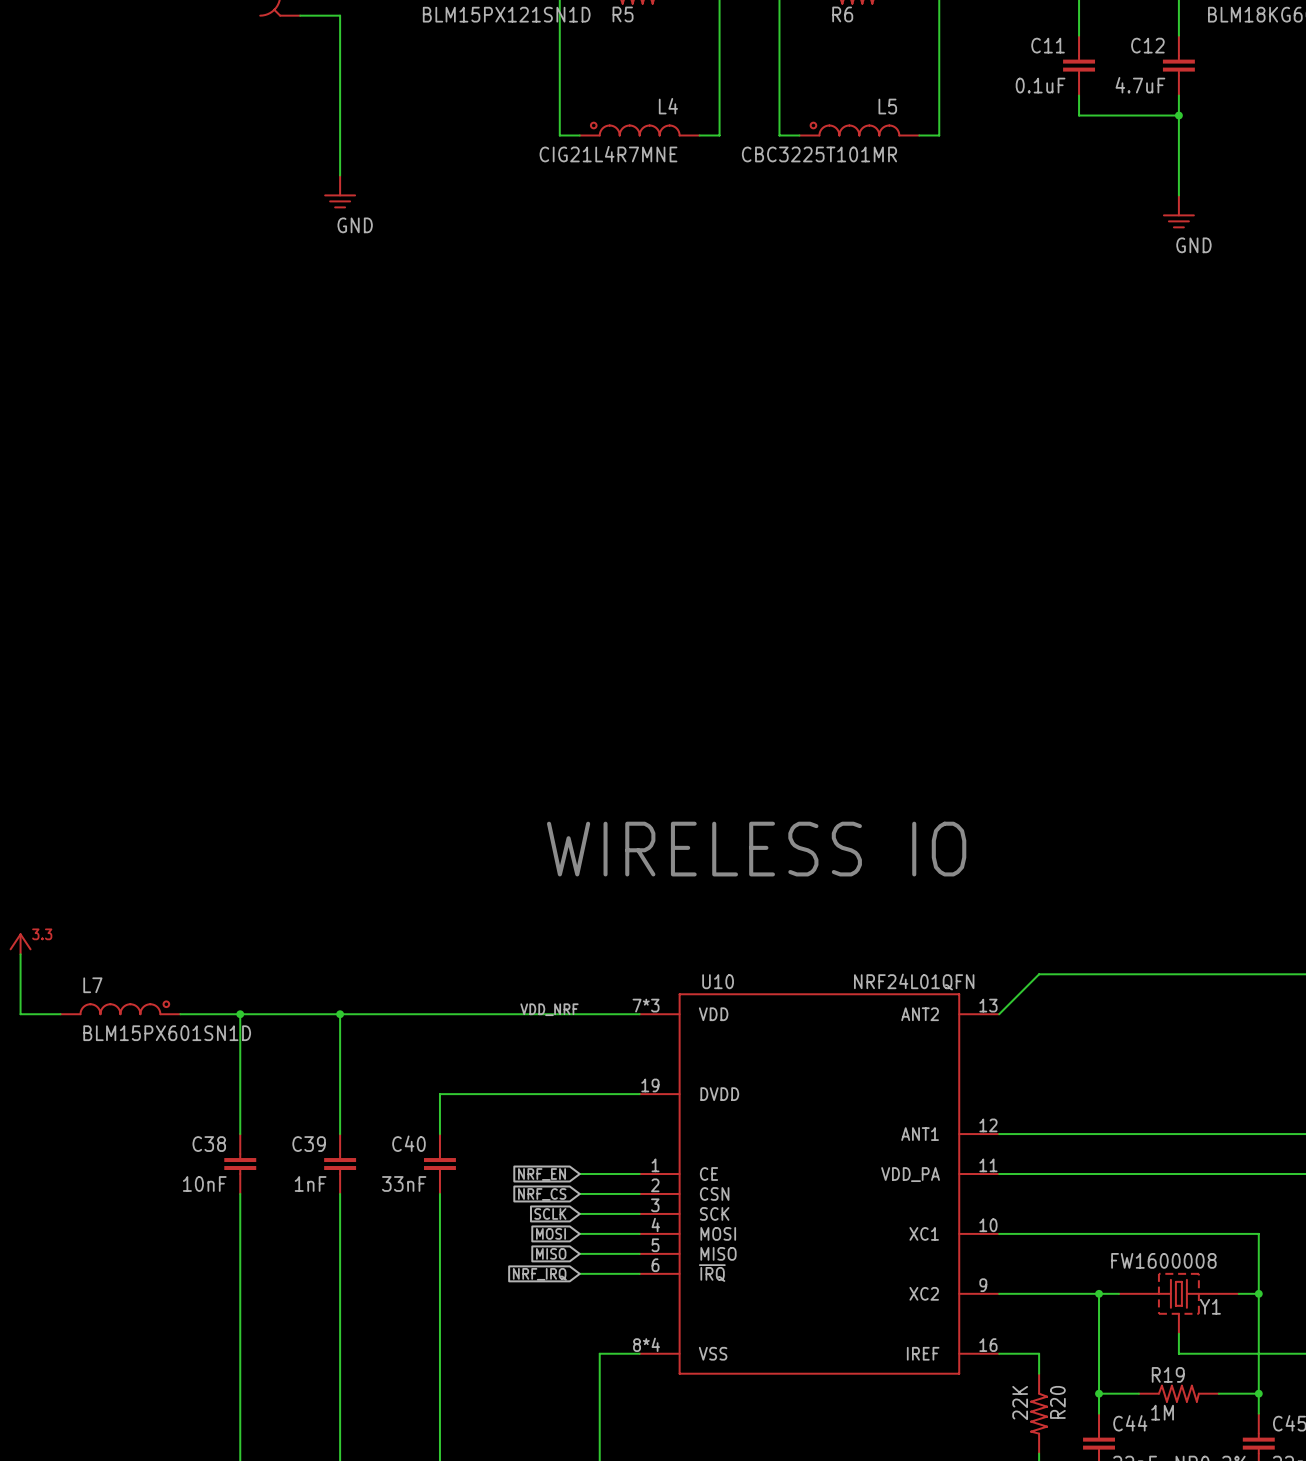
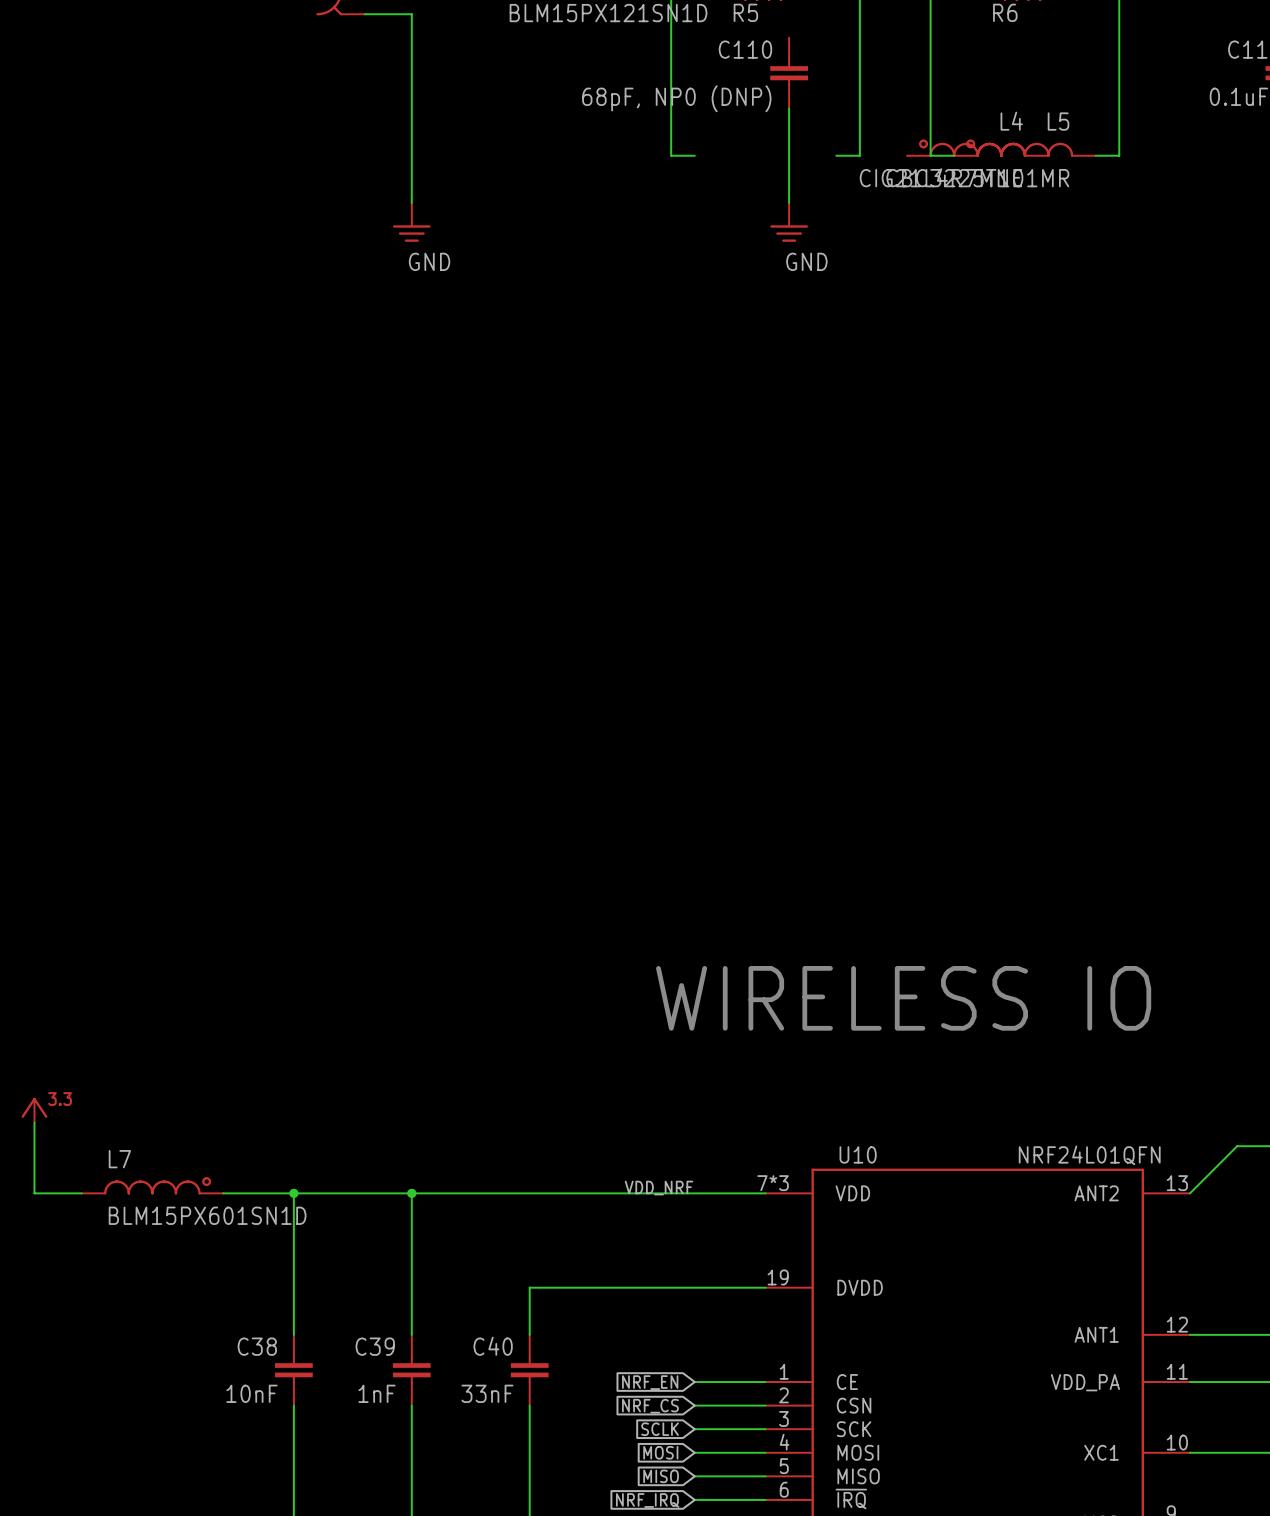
C110: none -> 68pF, NP0 (DNP) (789, 73)
wire: none -> (789, 108) (789, 202)
L4 position: (639, 129) -> (977, 148)
power symbol: none -> GND (789, 222)

